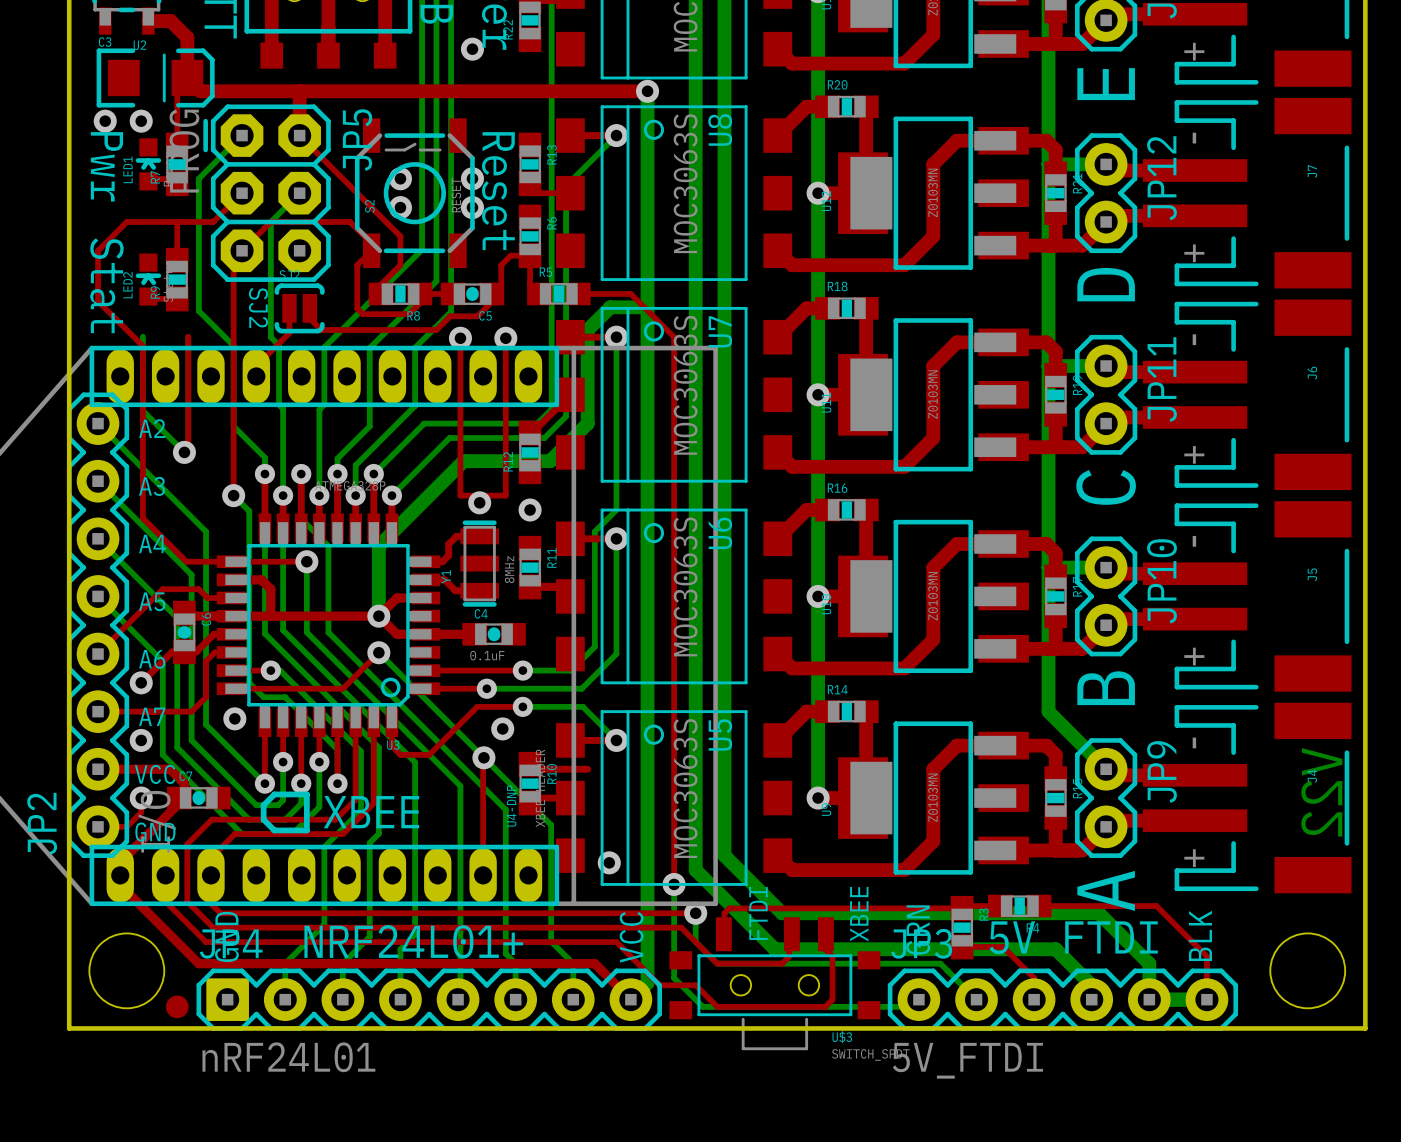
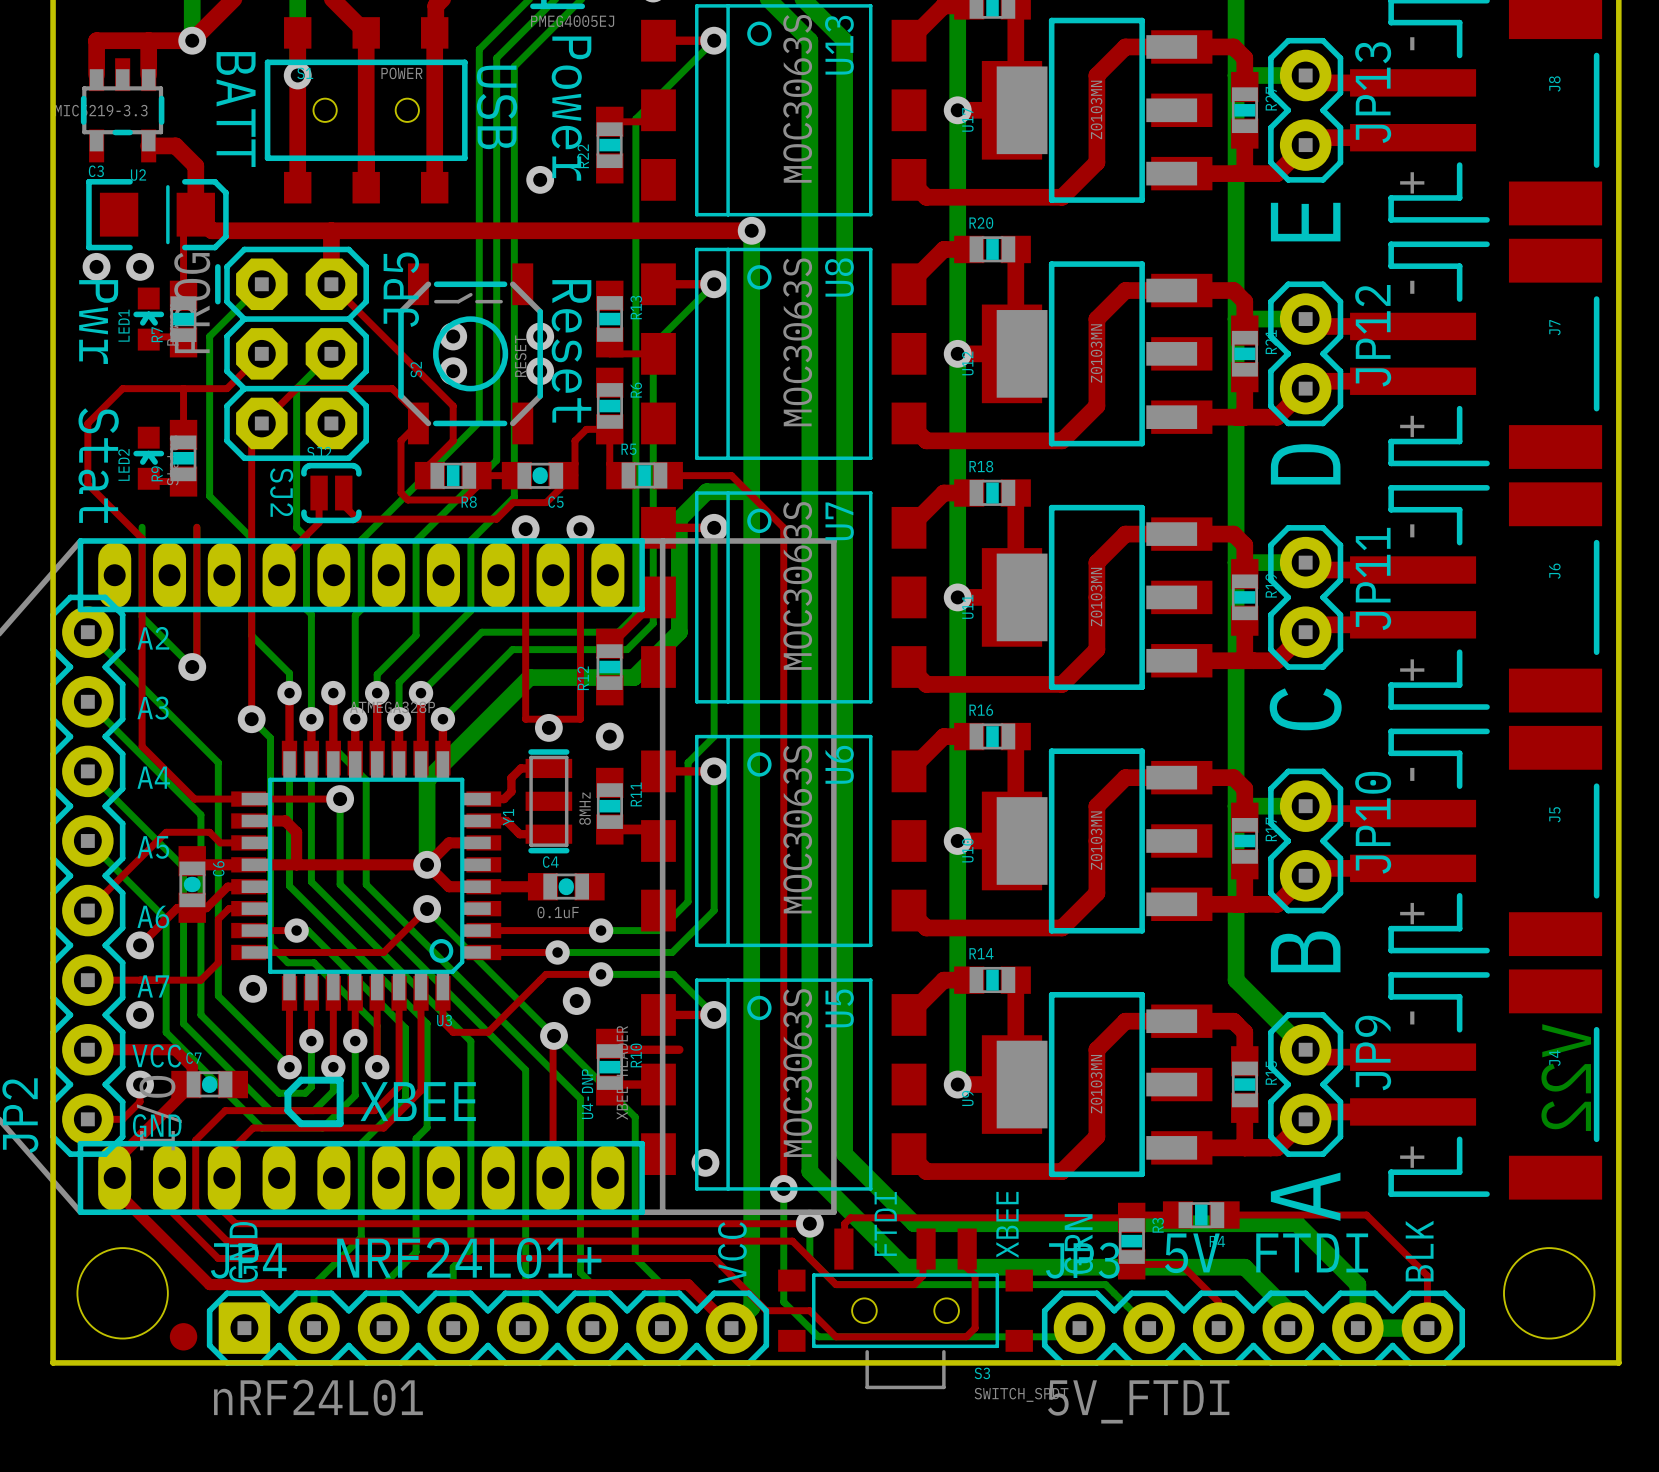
U$3 name: U$3 (842, 1037) -> S3 (982, 1373)

